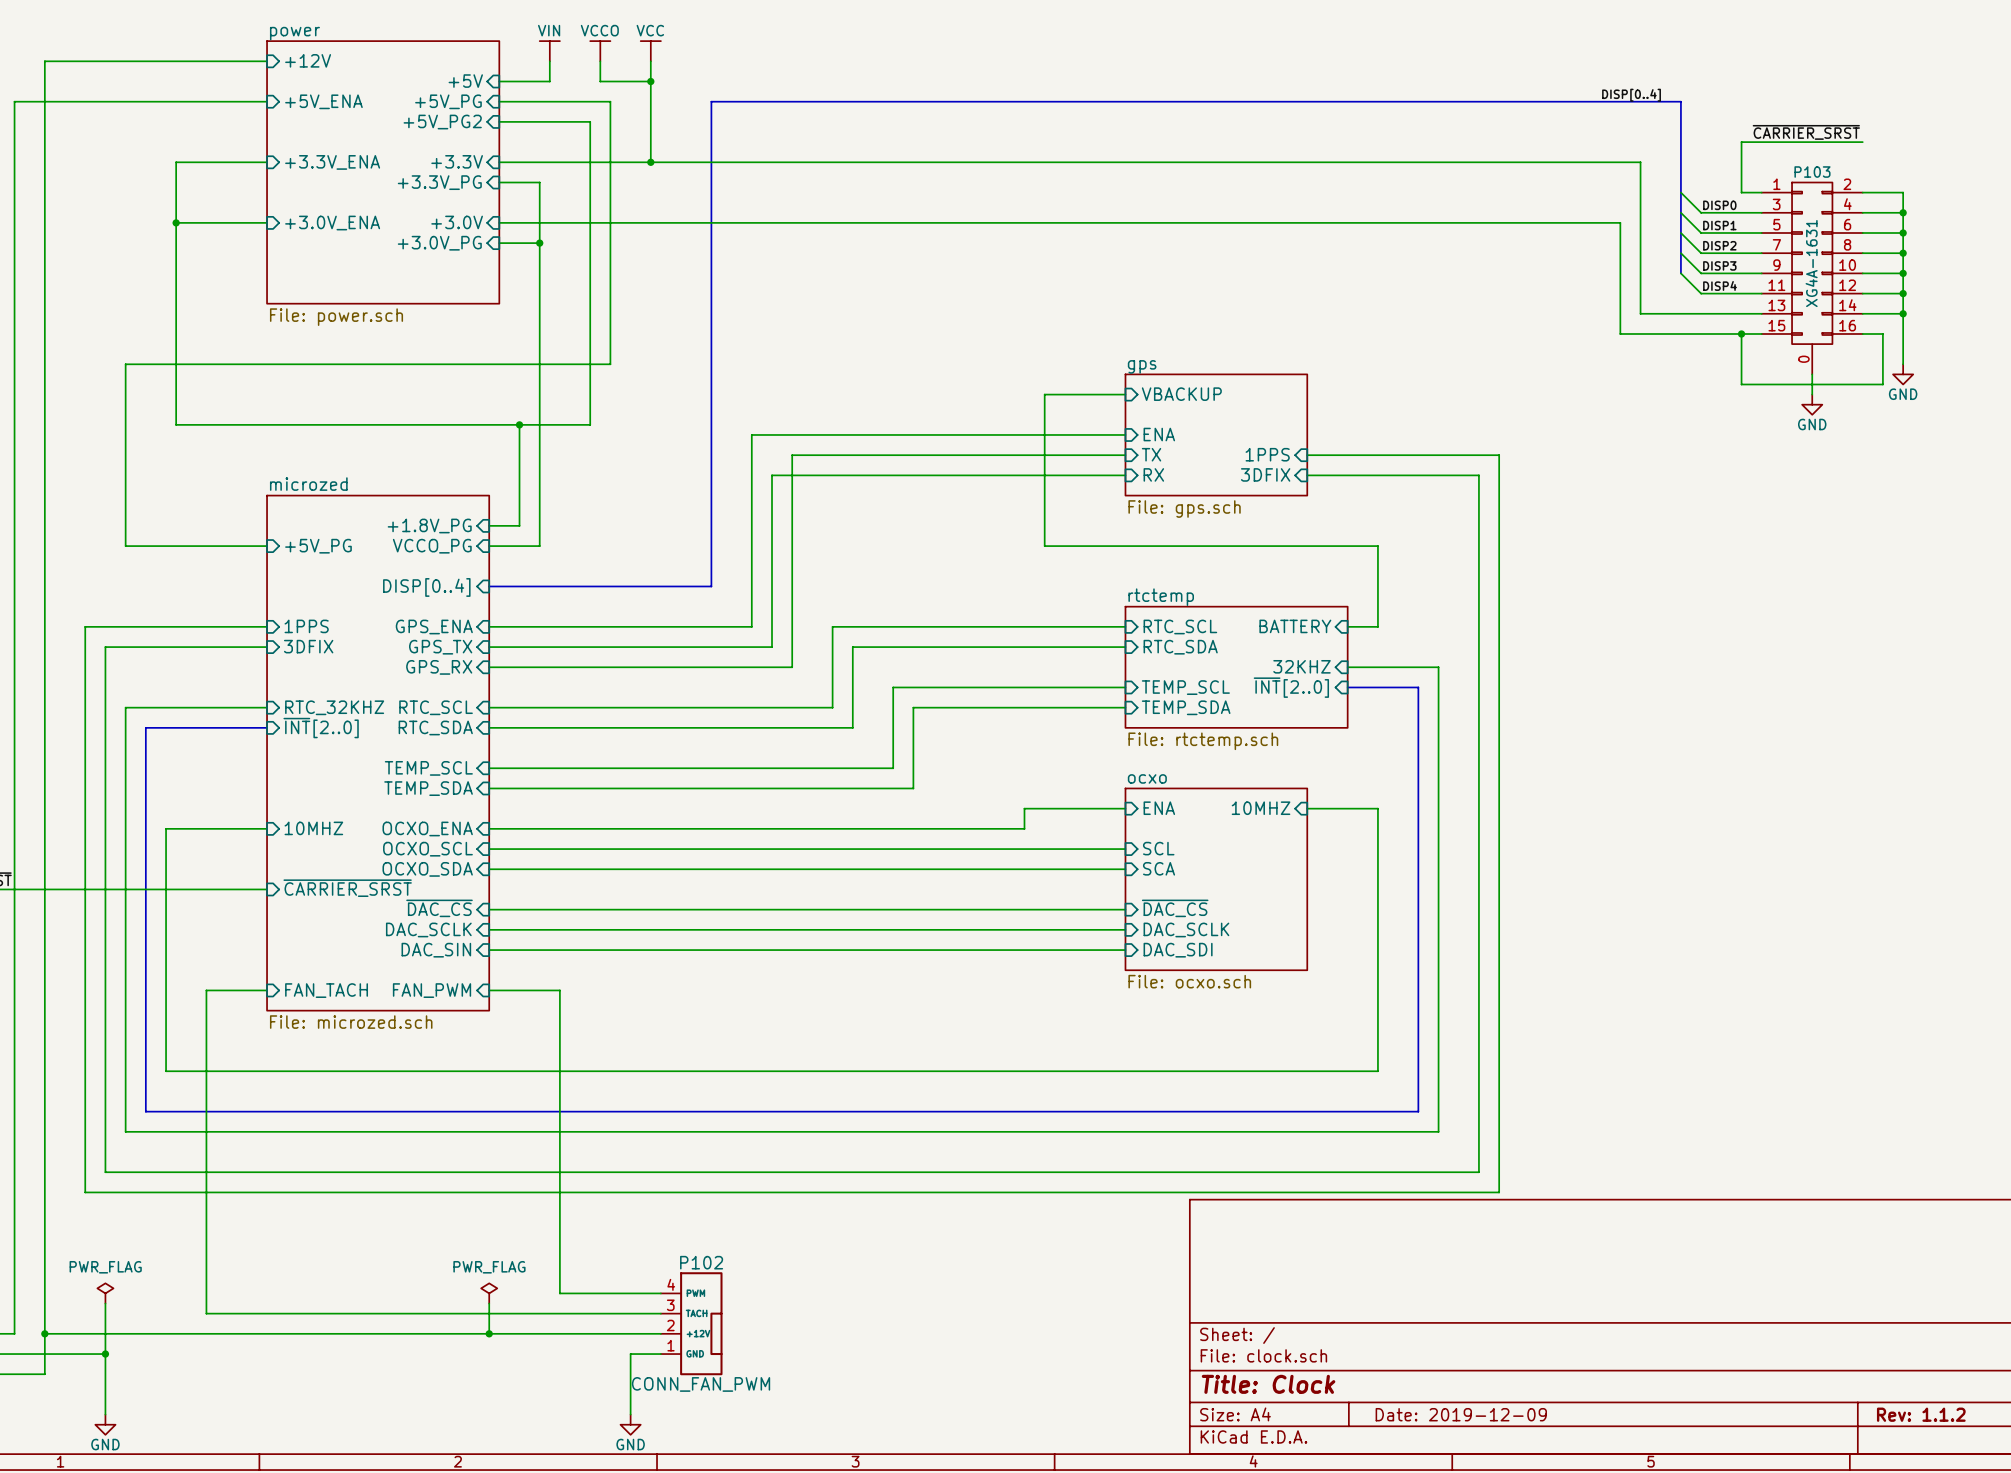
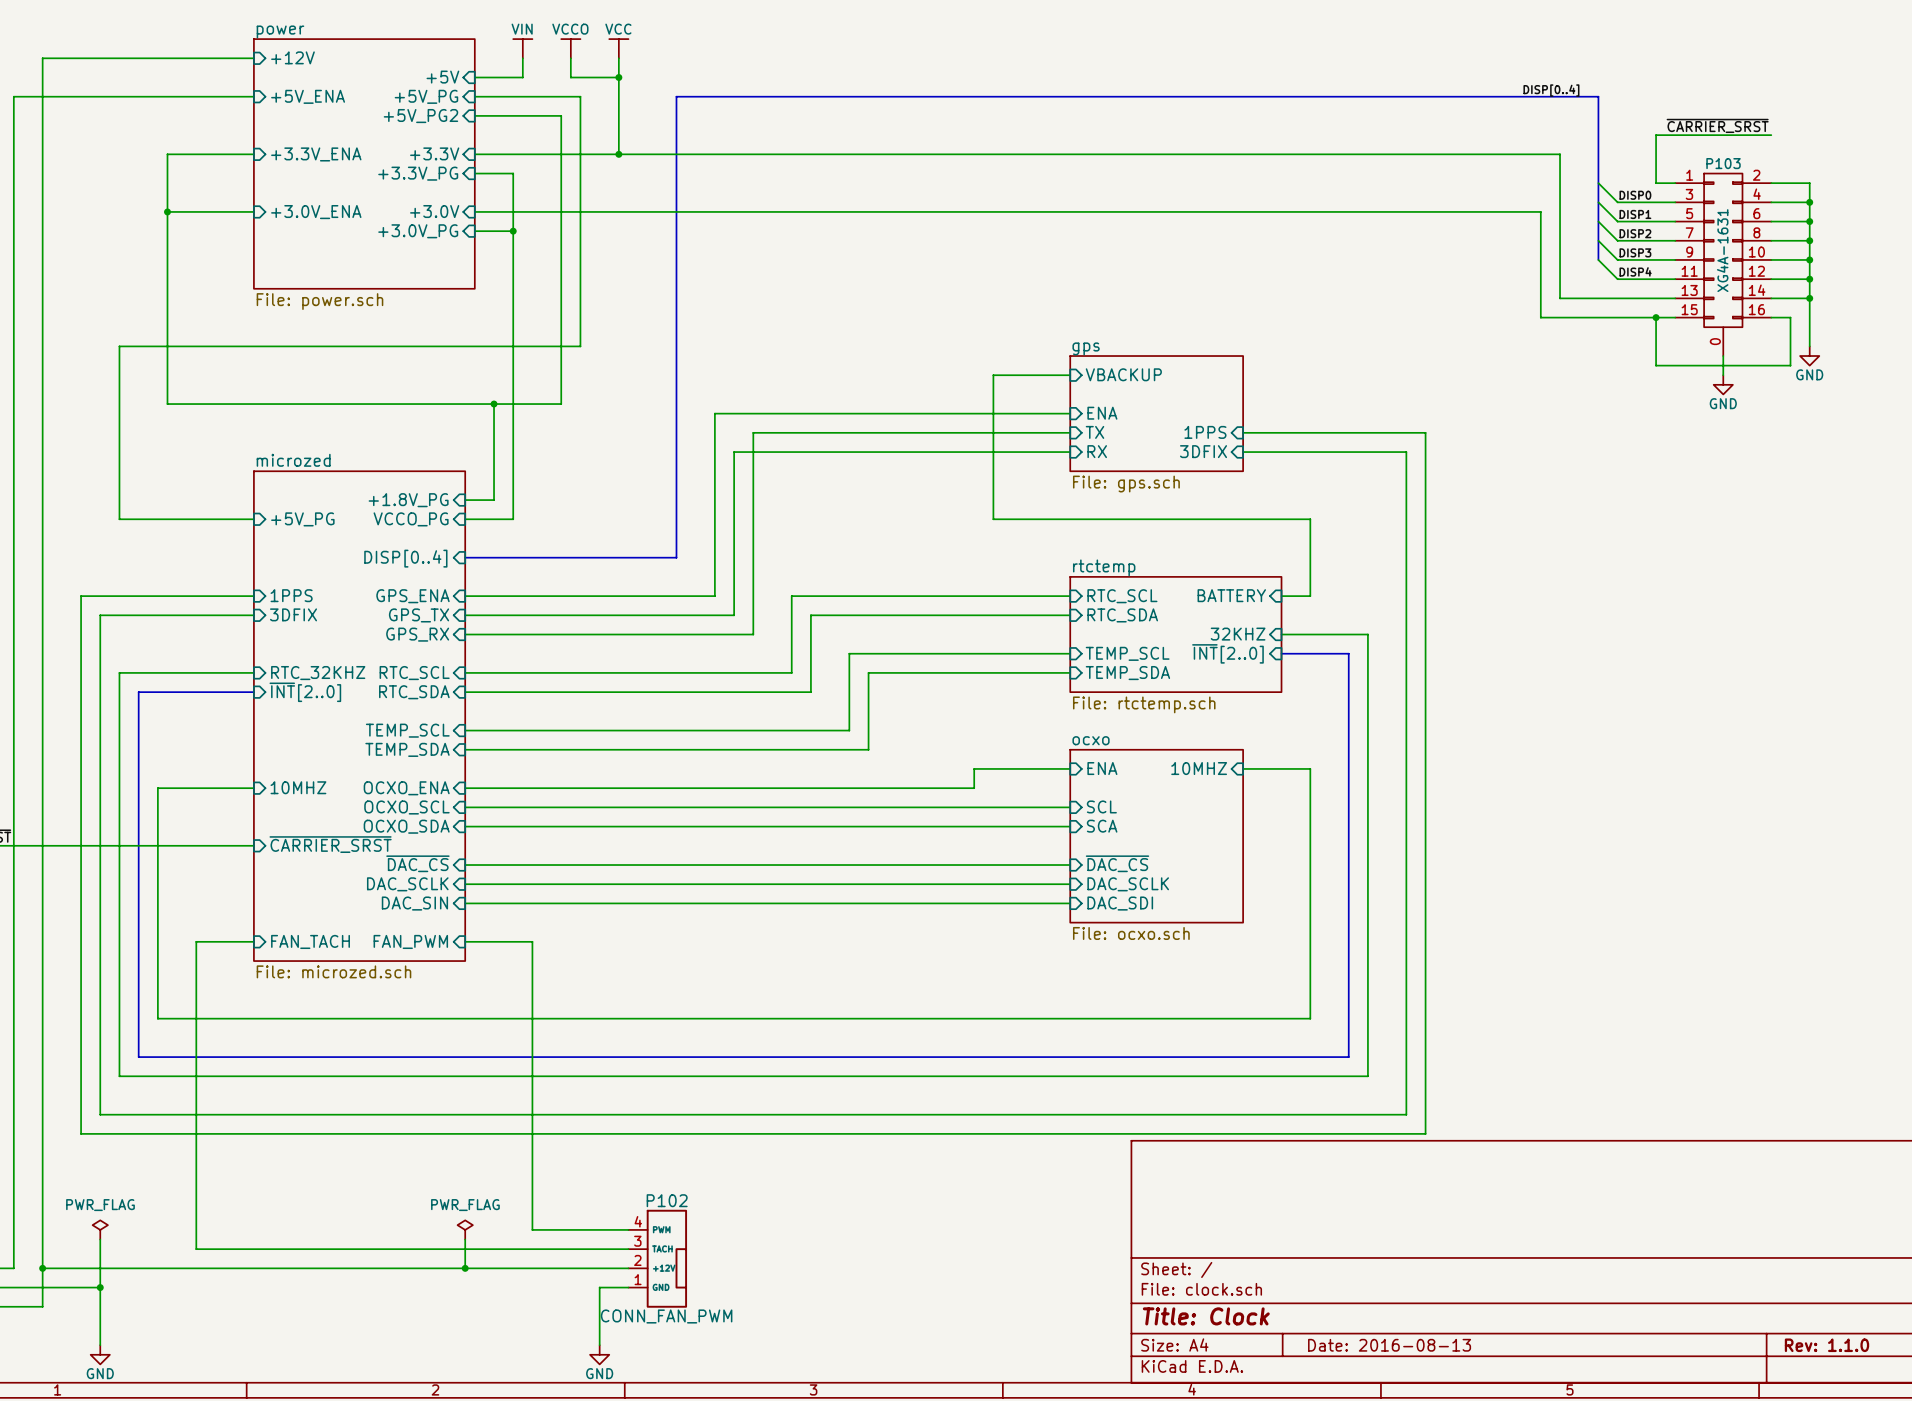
title block: Date: 2019-12-09 (1461, 1414) -> Date: 2016-08-13 (1389, 1345)
title block: Rev: 1.1.2 (1921, 1414) -> Rev: 1.1.0 (1826, 1345)

